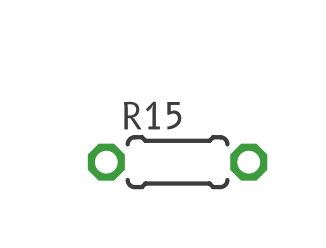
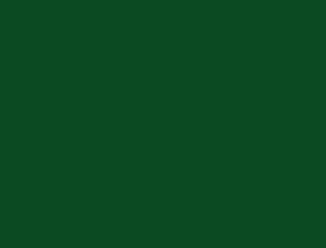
R15: (177, 162) -> none

